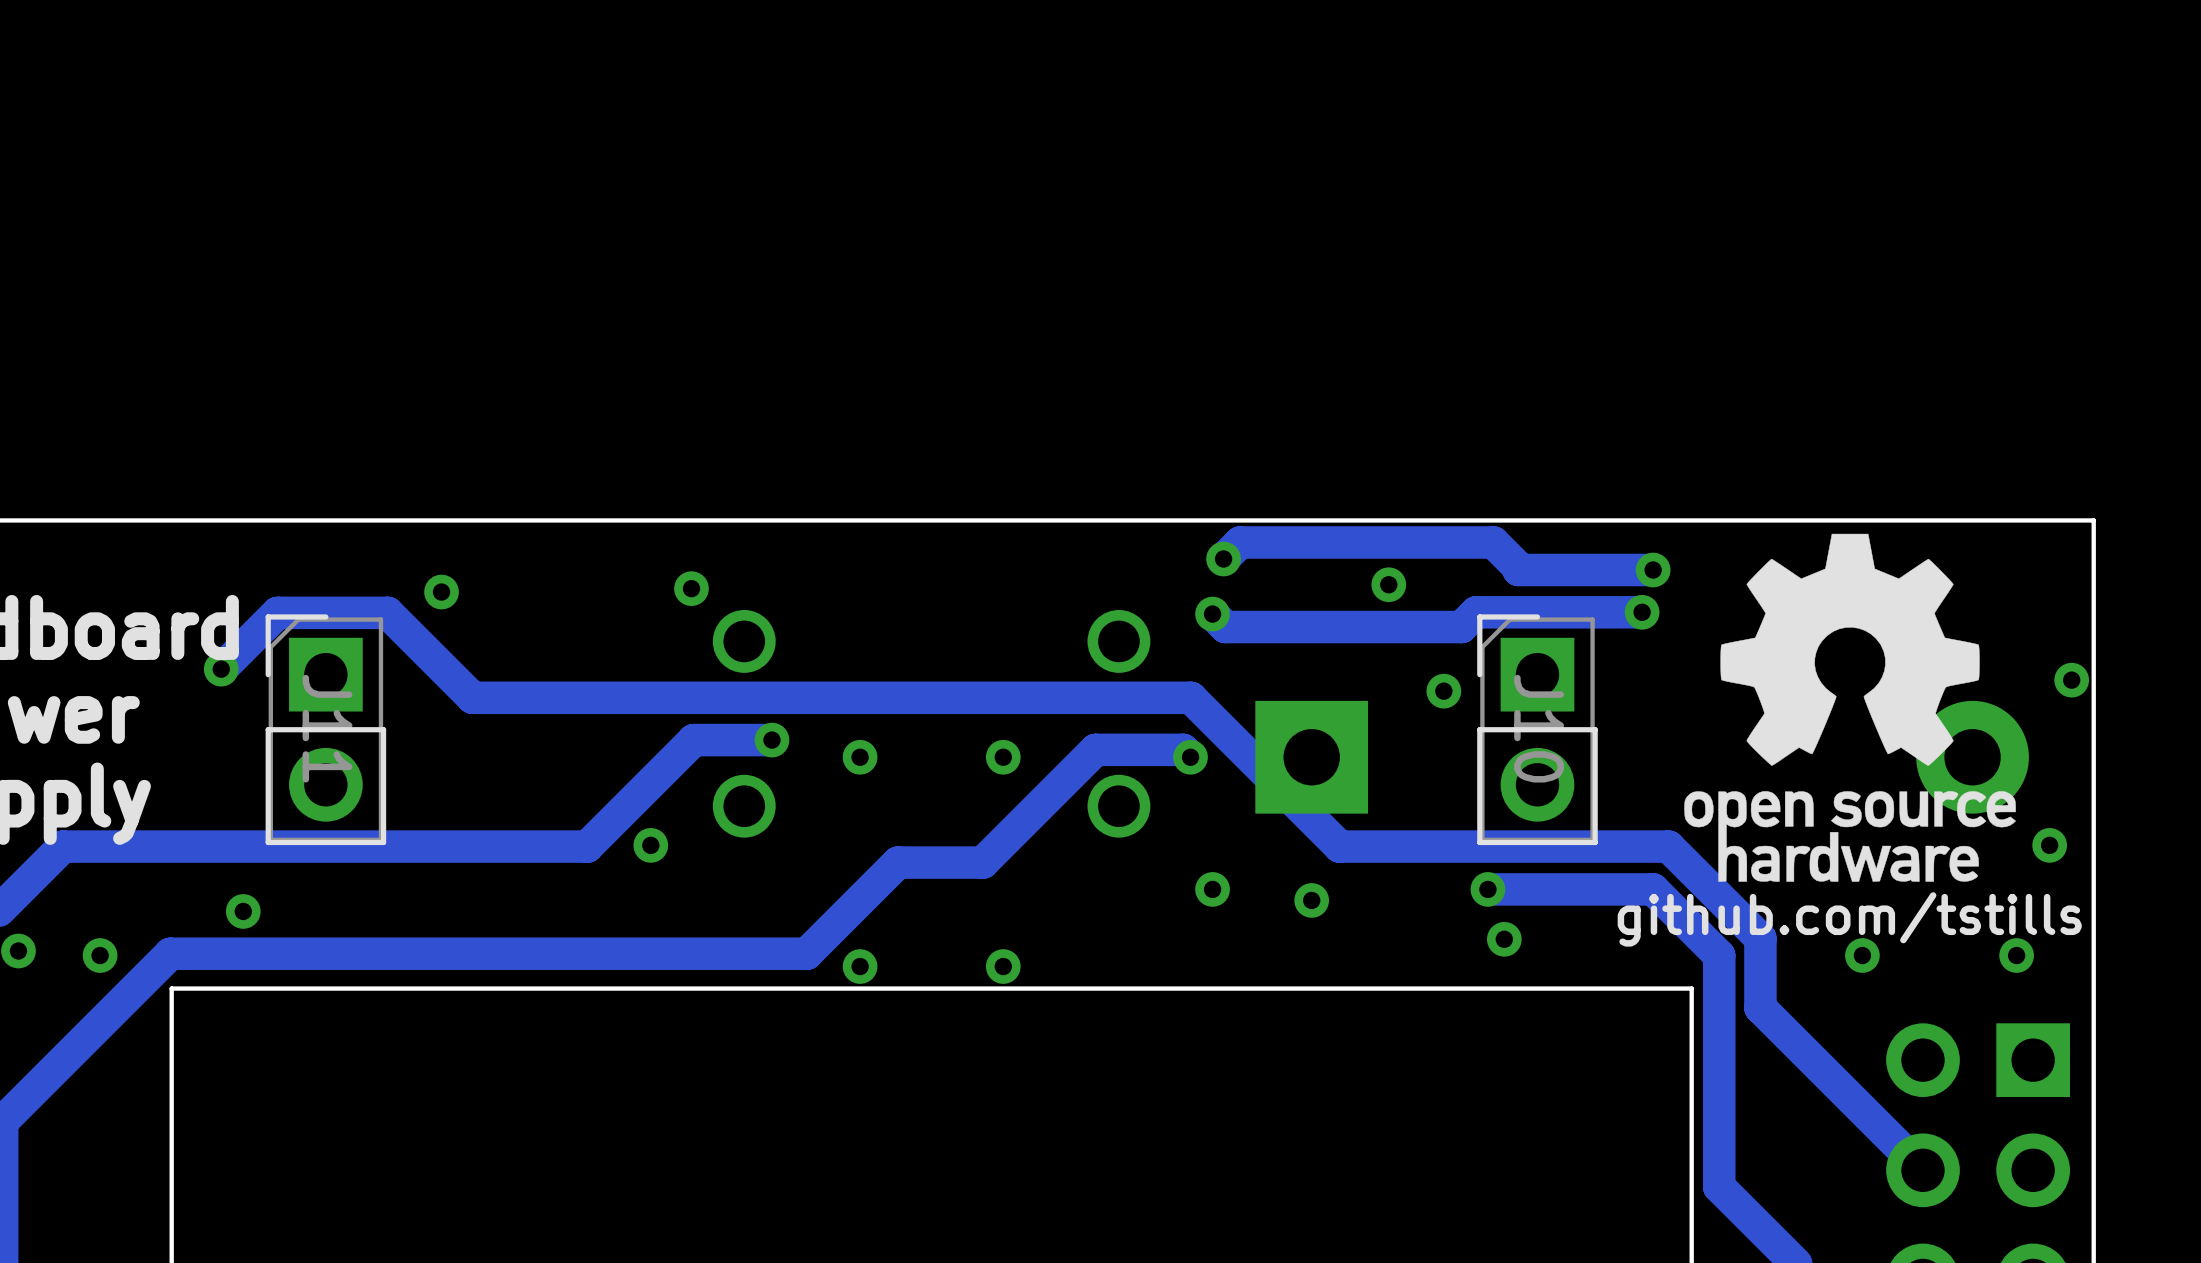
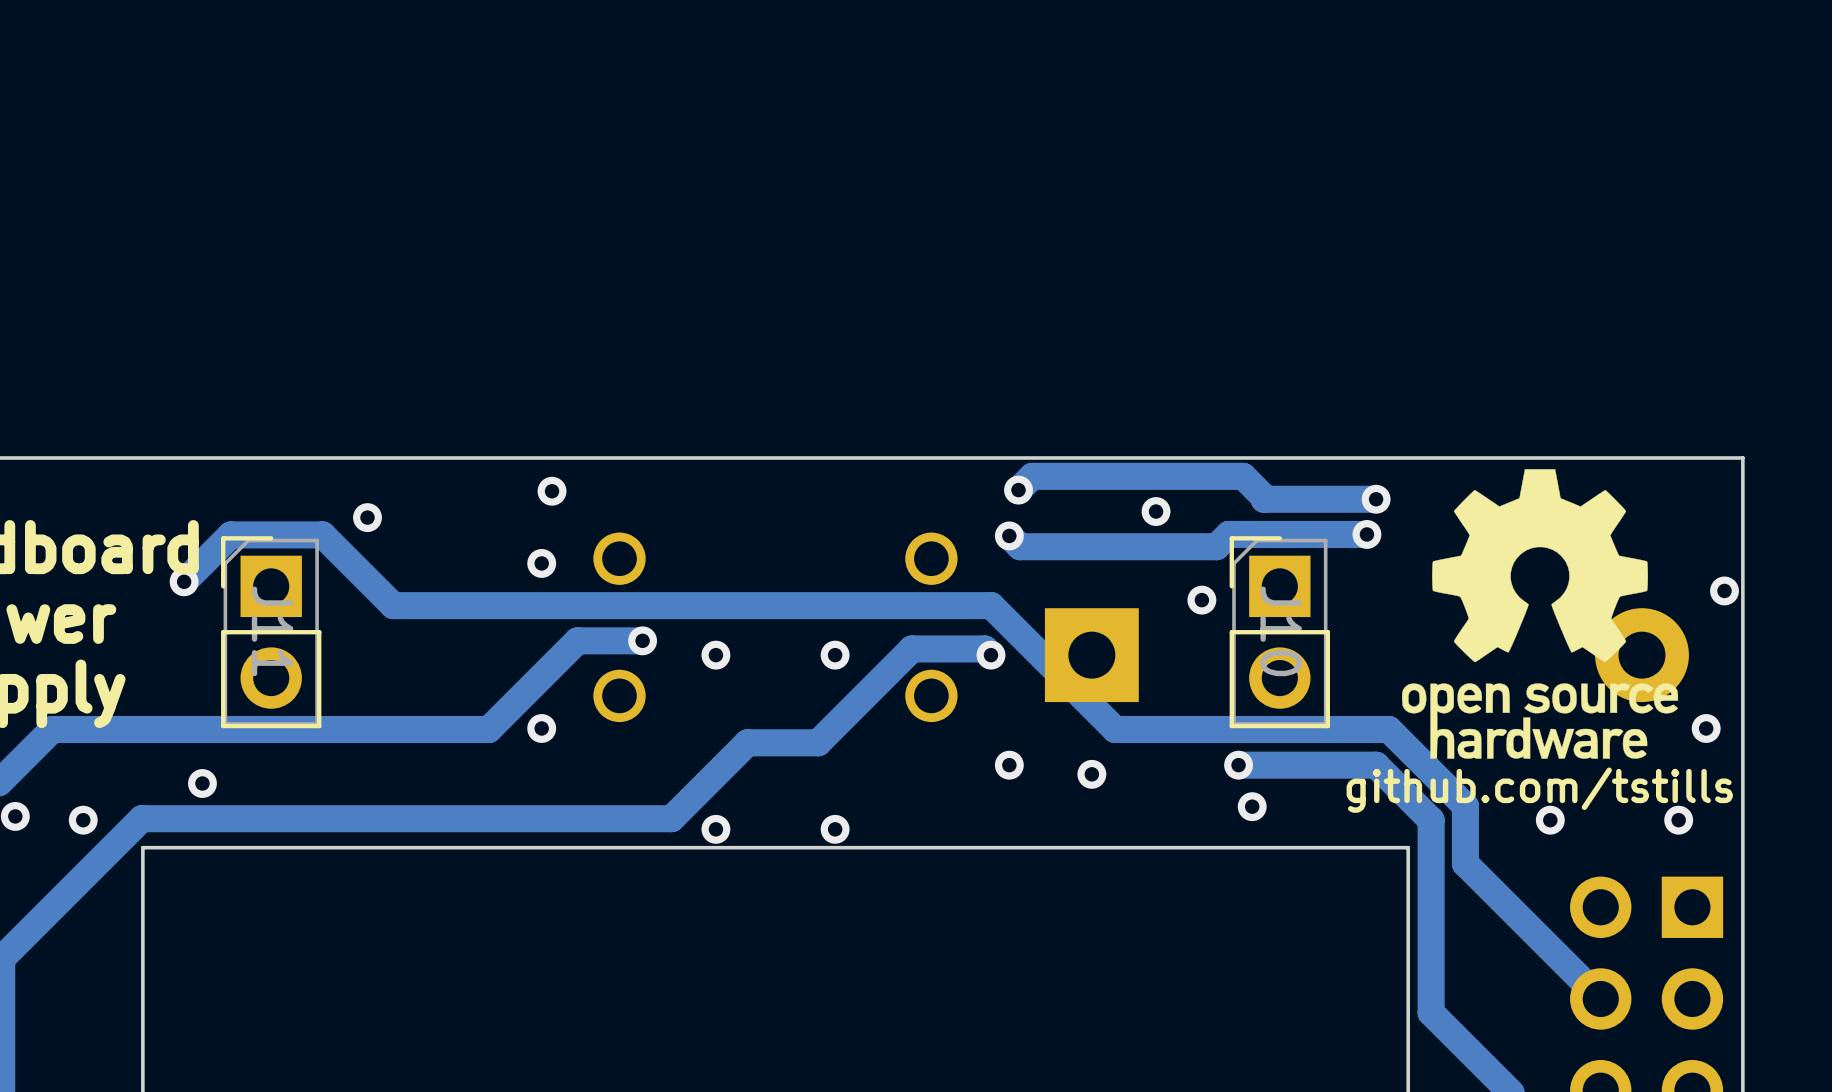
via position: (691, 588) -> (552, 491)
via: none -> (541, 563)

